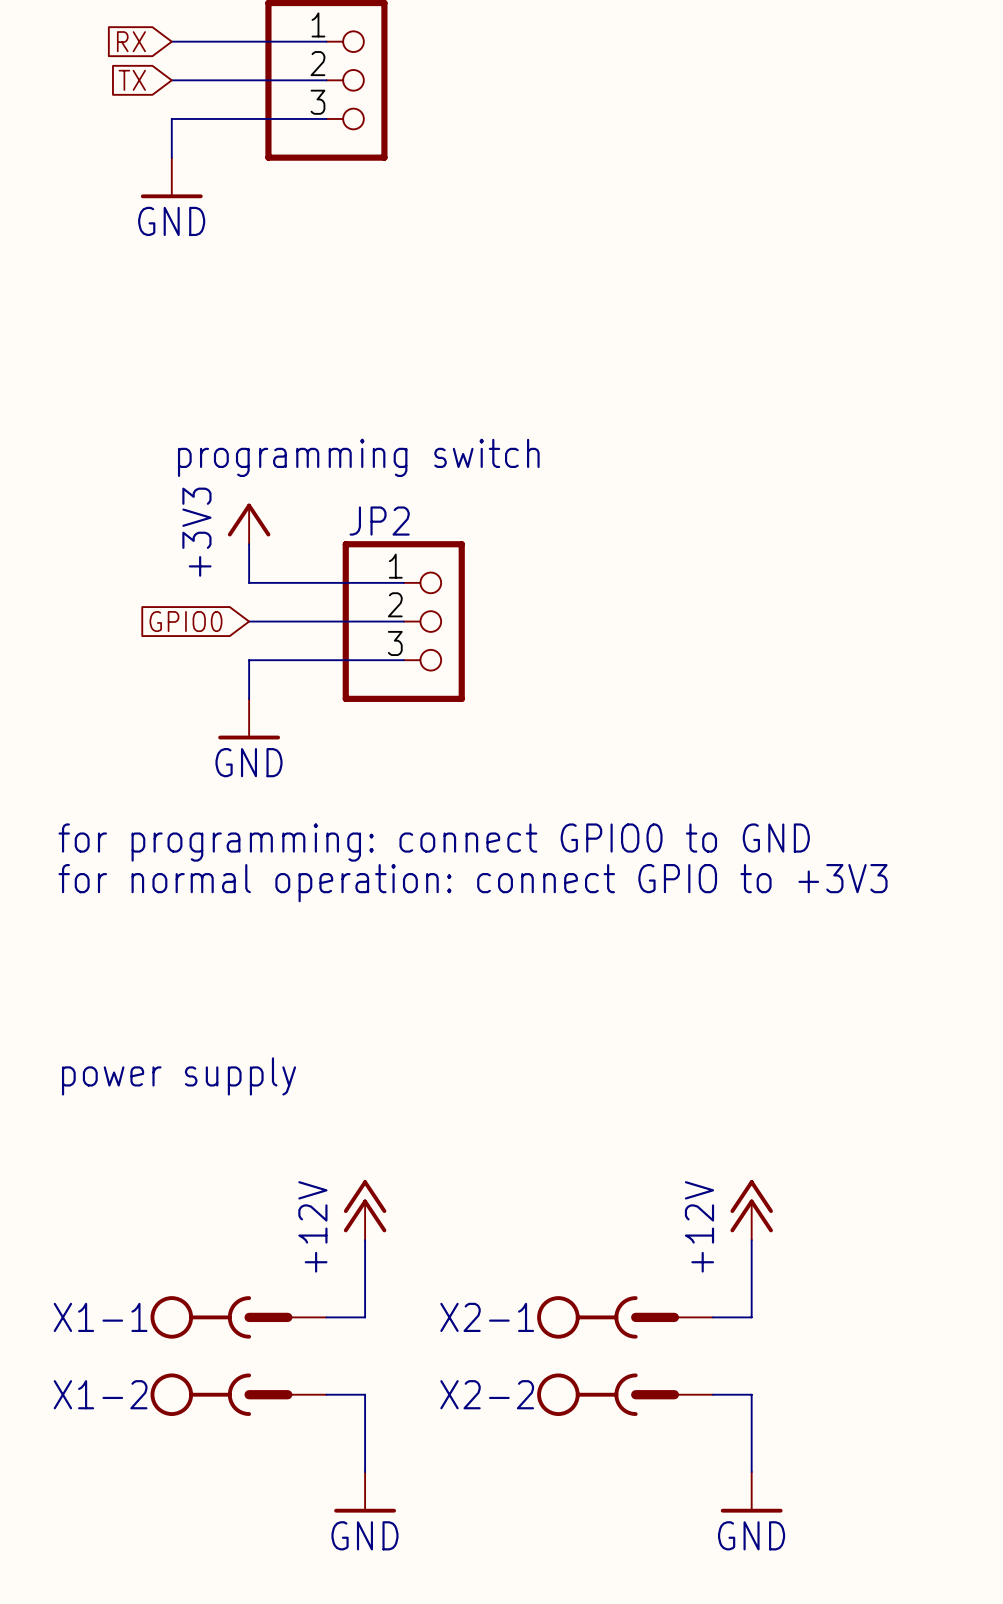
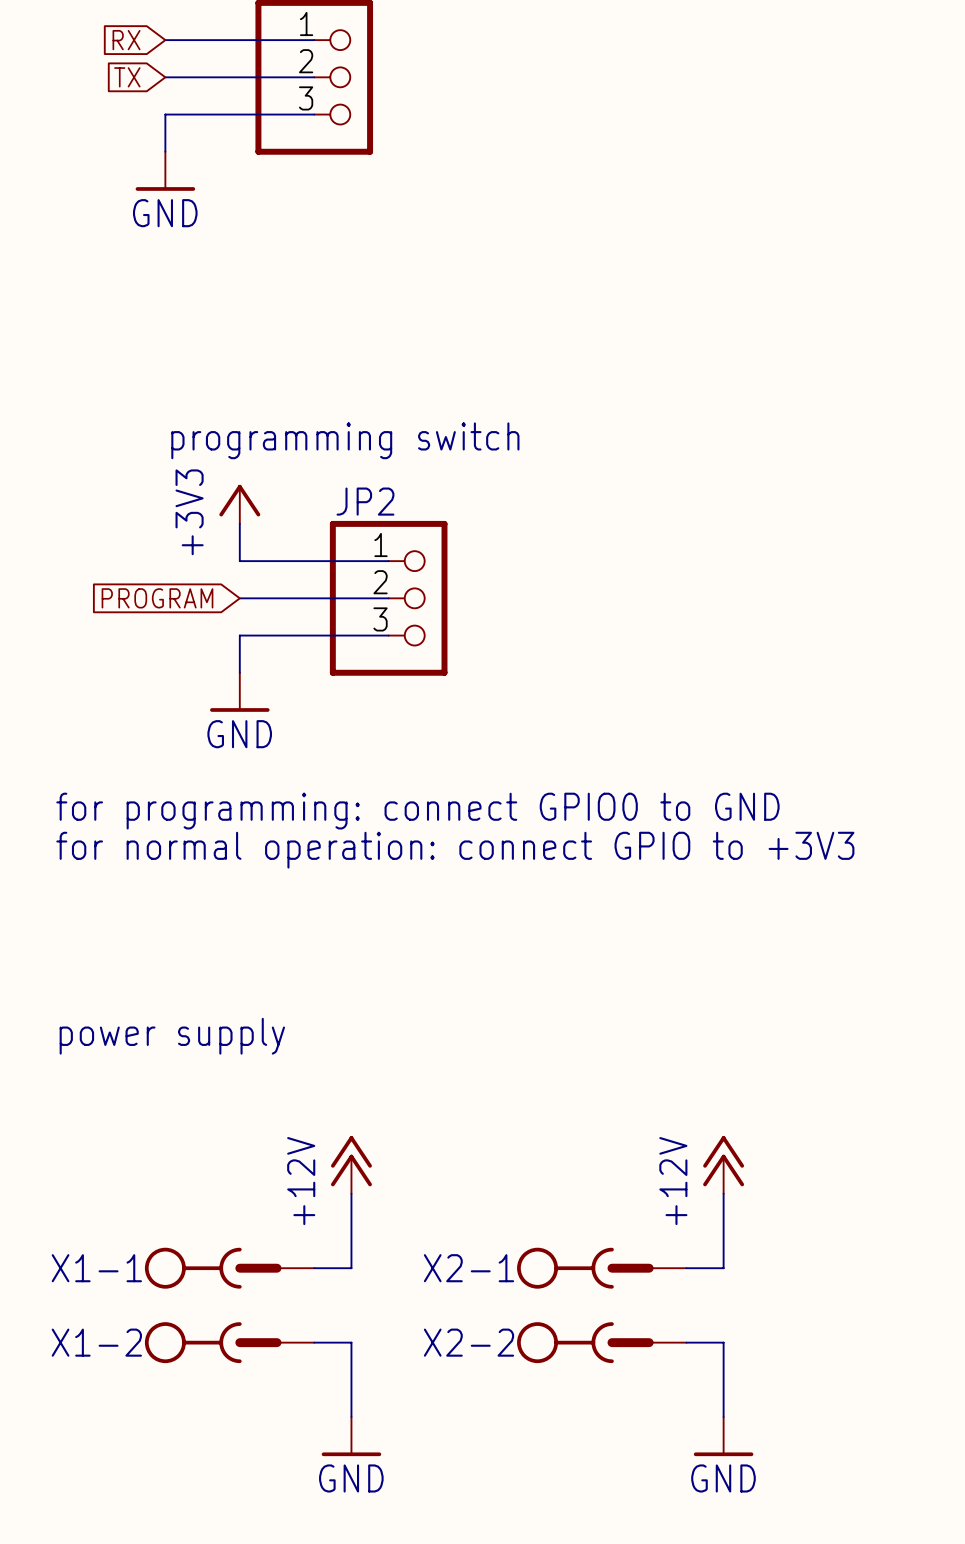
global label: GPIO0 (185, 621) -> PROGRAM (157, 598)

